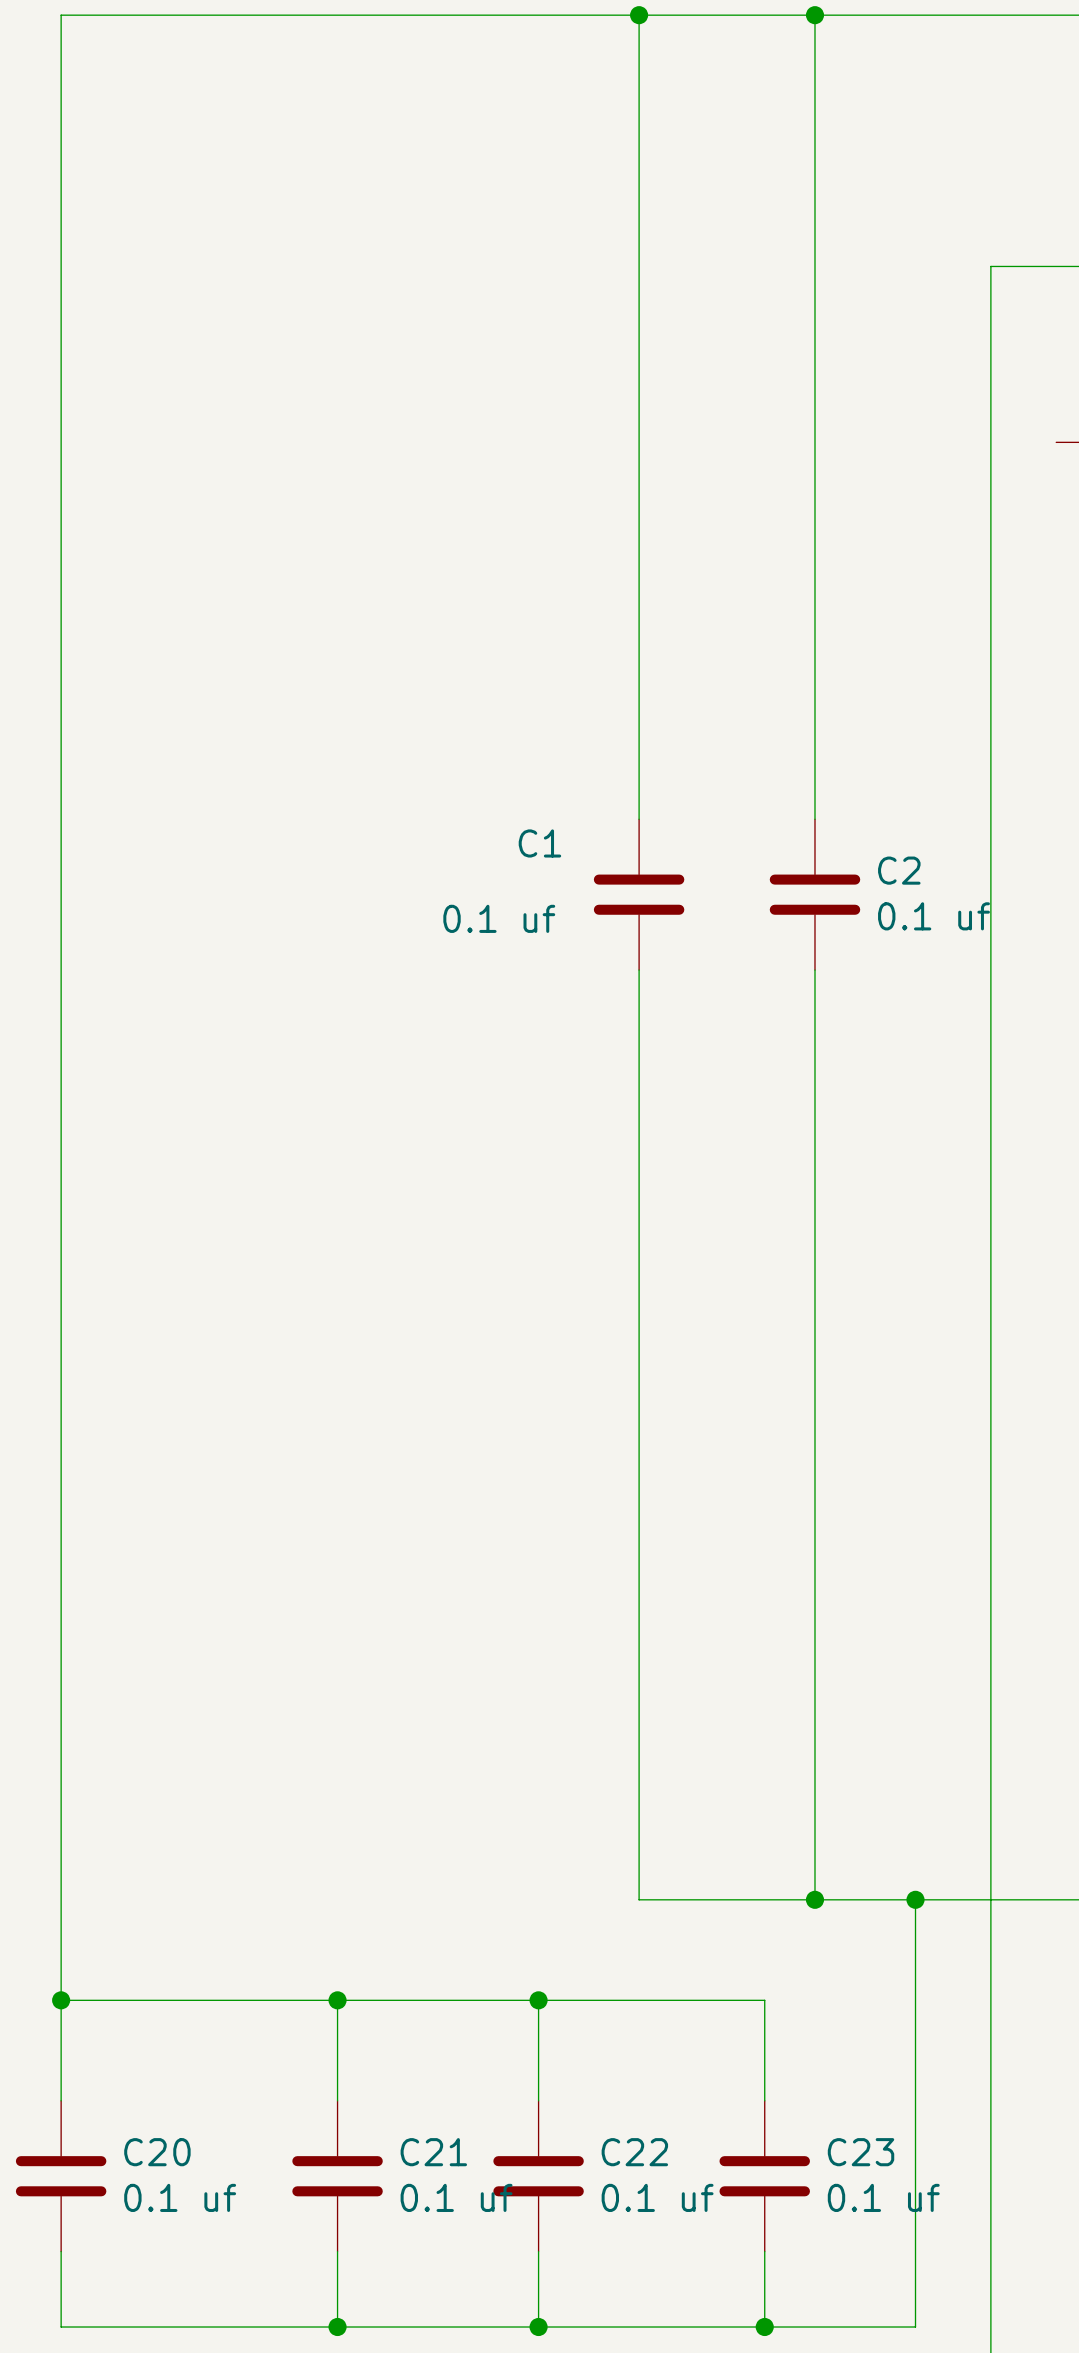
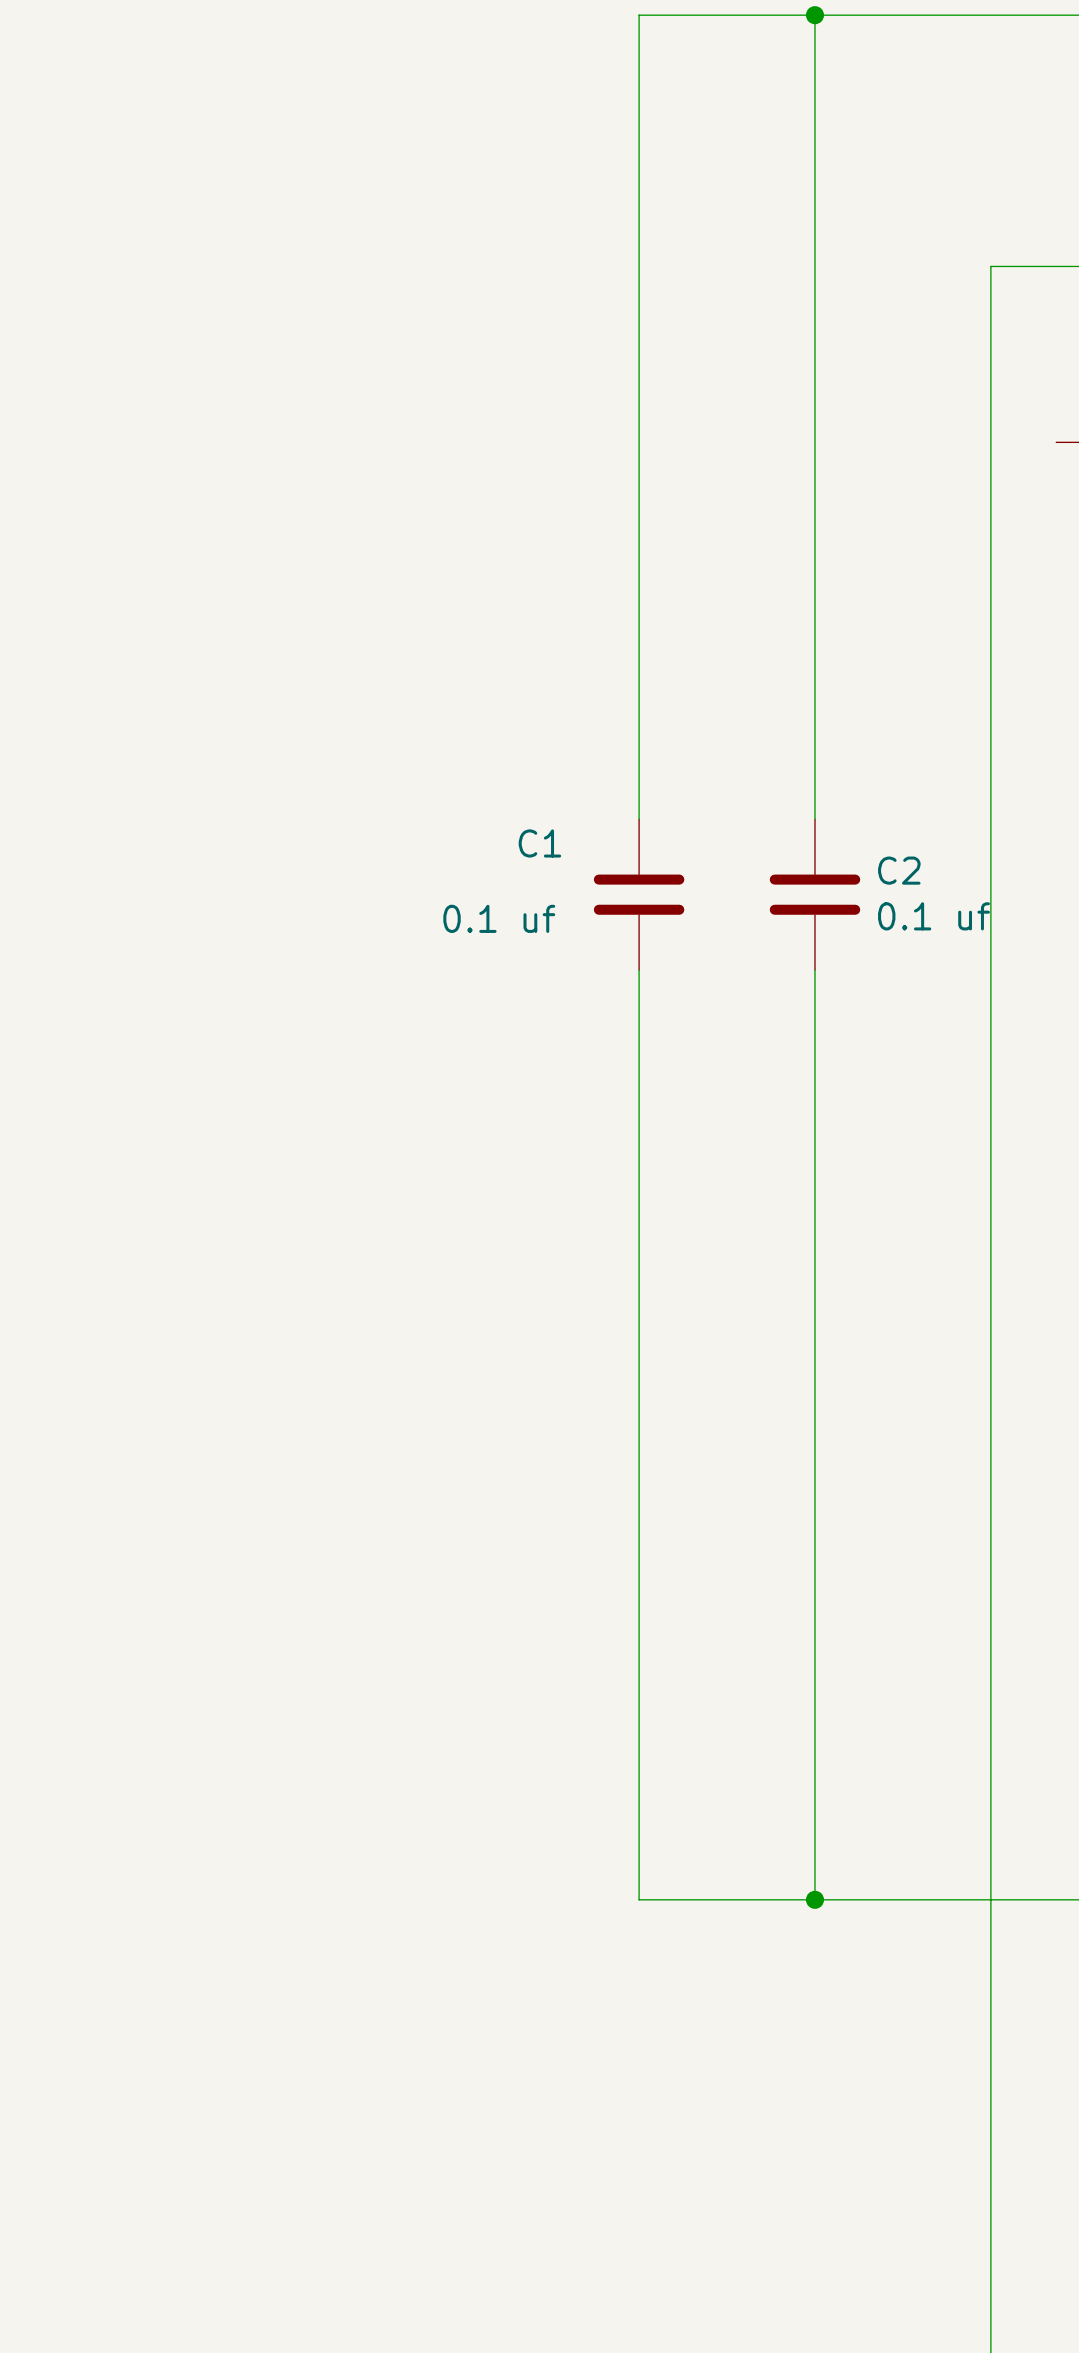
wire: (639, 15) (61, 15) (61, 2100) -> none
junction: (639, 15) -> none
wire: (915, 1899) (915, 2327) (61, 2327) (61, 2251) -> none
junction: (915, 1899) -> none
wire: (61, 2000) (764, 2000) (764, 2100) -> none
junction: (61, 2000) -> none
wire: (337, 2000) (337, 2100) -> none
junction: (337, 2000) -> none
wire: (538, 2000) (538, 2100) -> none
junction: (538, 2000) -> none
C20: 0.1 uf (61, 2176) -> none
C21: 0.1 uf (337, 2176) -> none
C22: 0.1 uf (538, 2176) -> none
C23: 0.1 uf (764, 2176) -> none
wire: (337, 2251) (337, 2327) -> none
wire: (538, 2251) (538, 2327) -> none
wire: (764, 2251) (764, 2327) -> none
junction: (337, 2327) -> none
junction: (538, 2327) -> none
junction: (764, 2327) -> none

